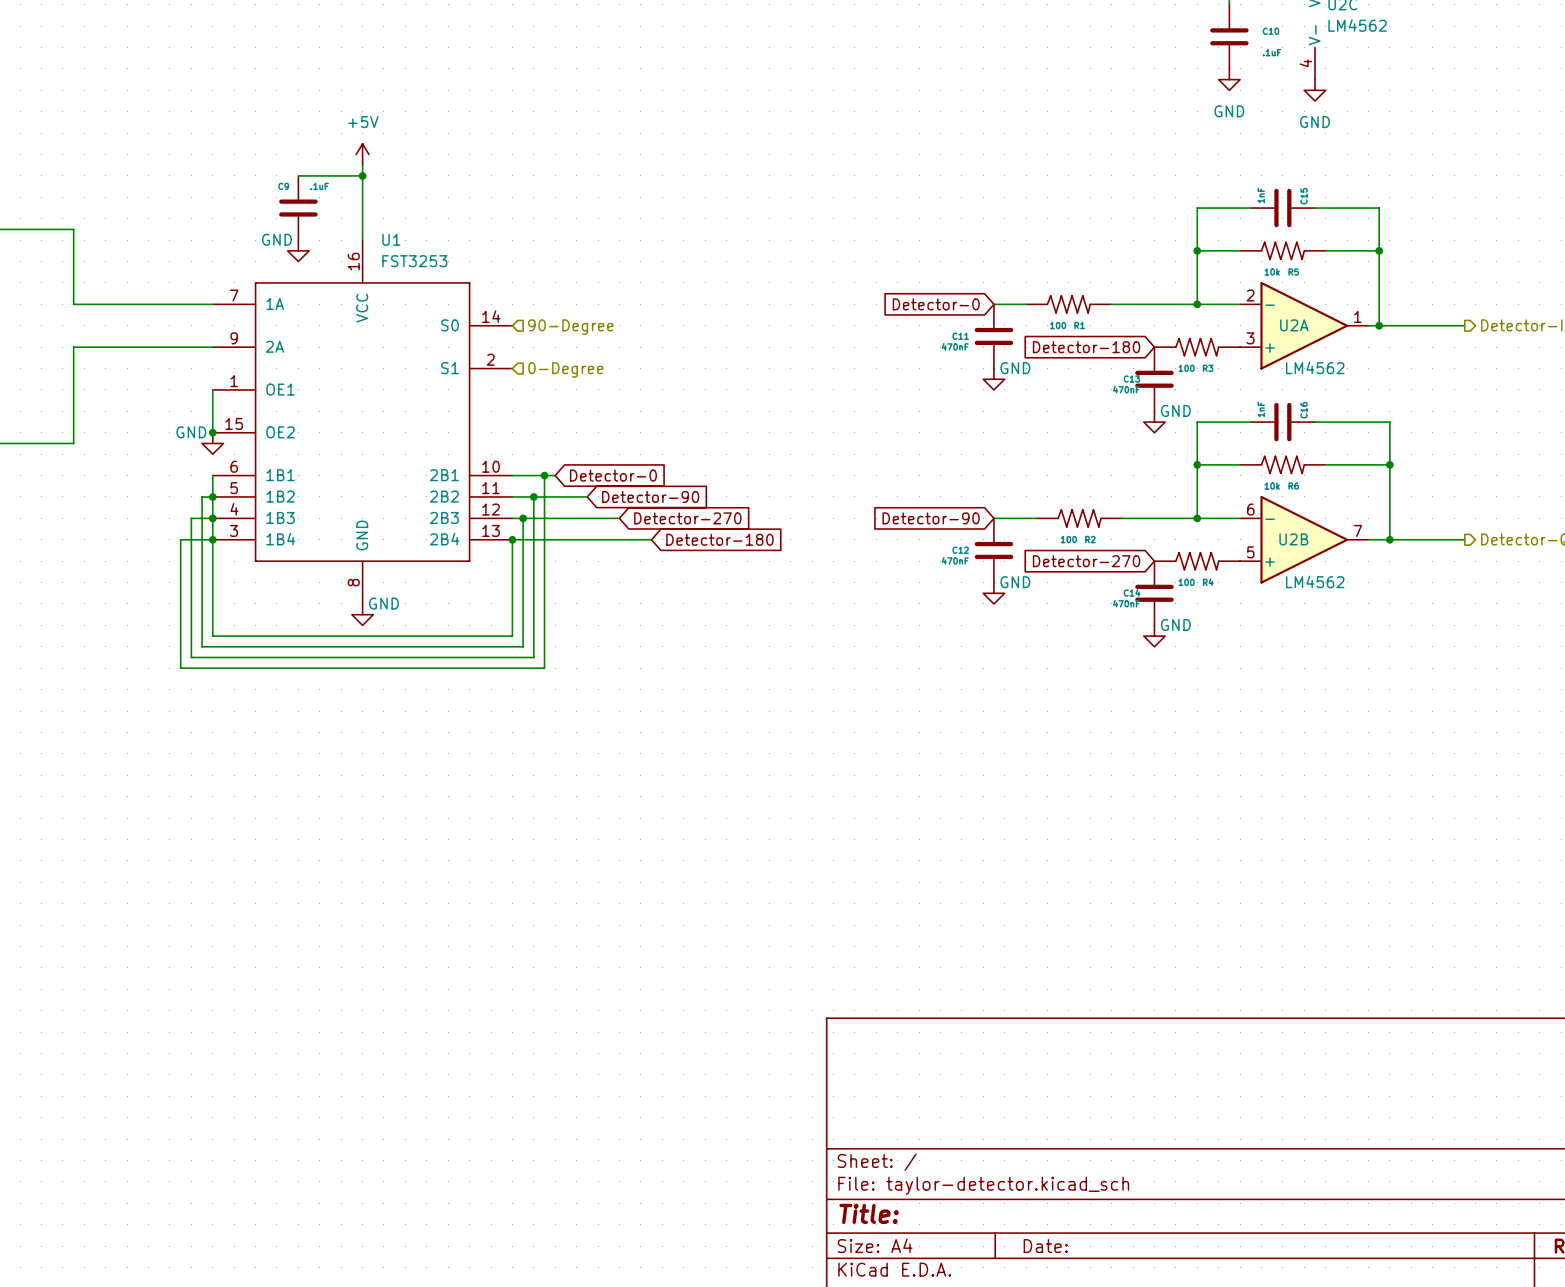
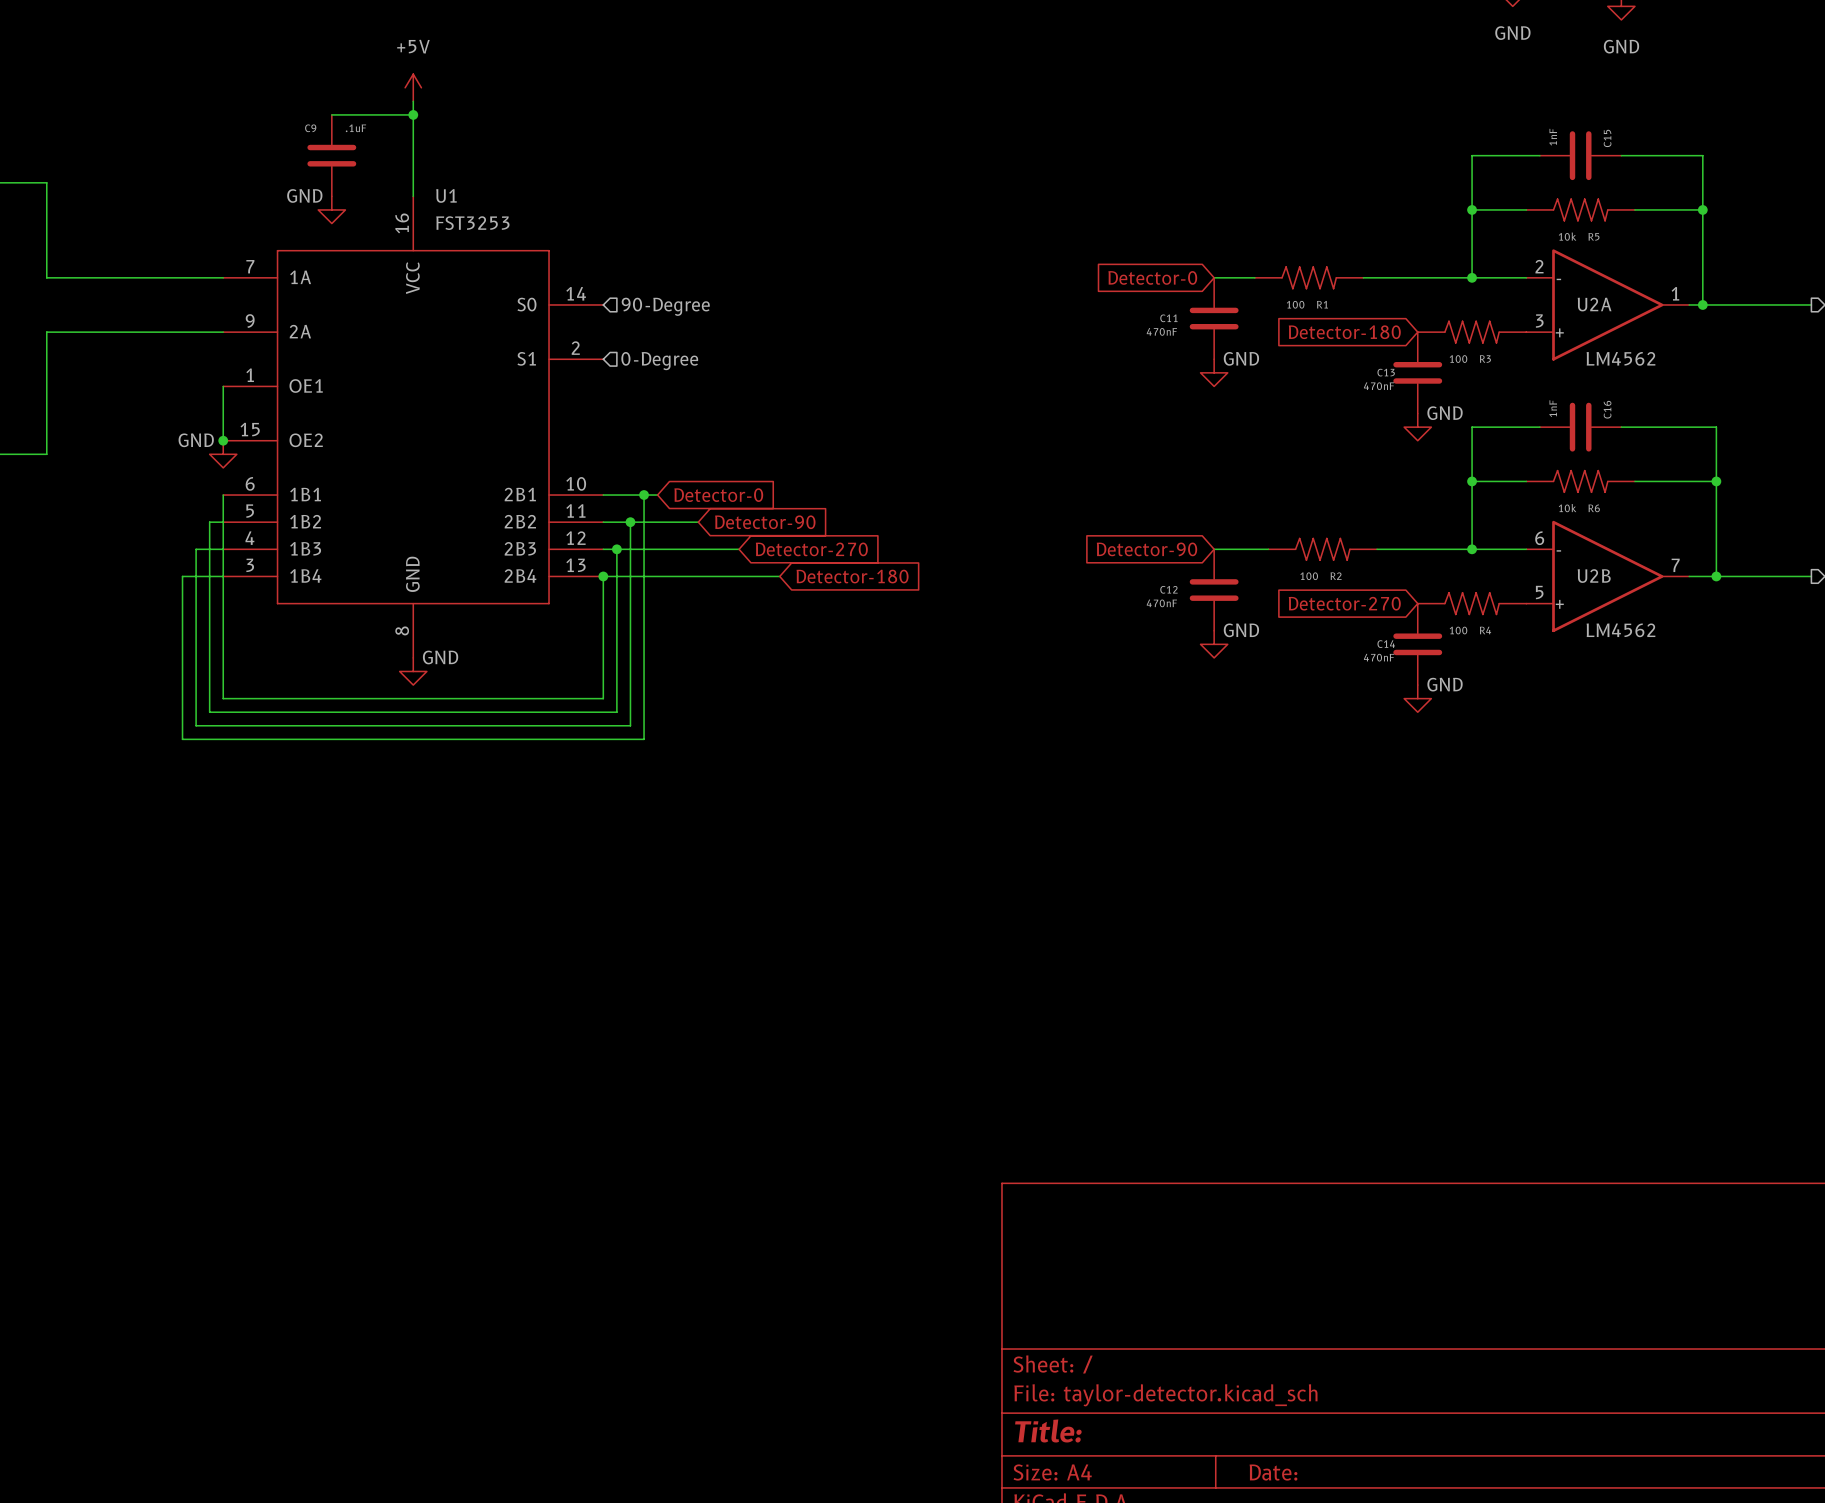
junction: (212, 496) -> none
junction: (212, 518) -> none
junction: (212, 539) -> none

